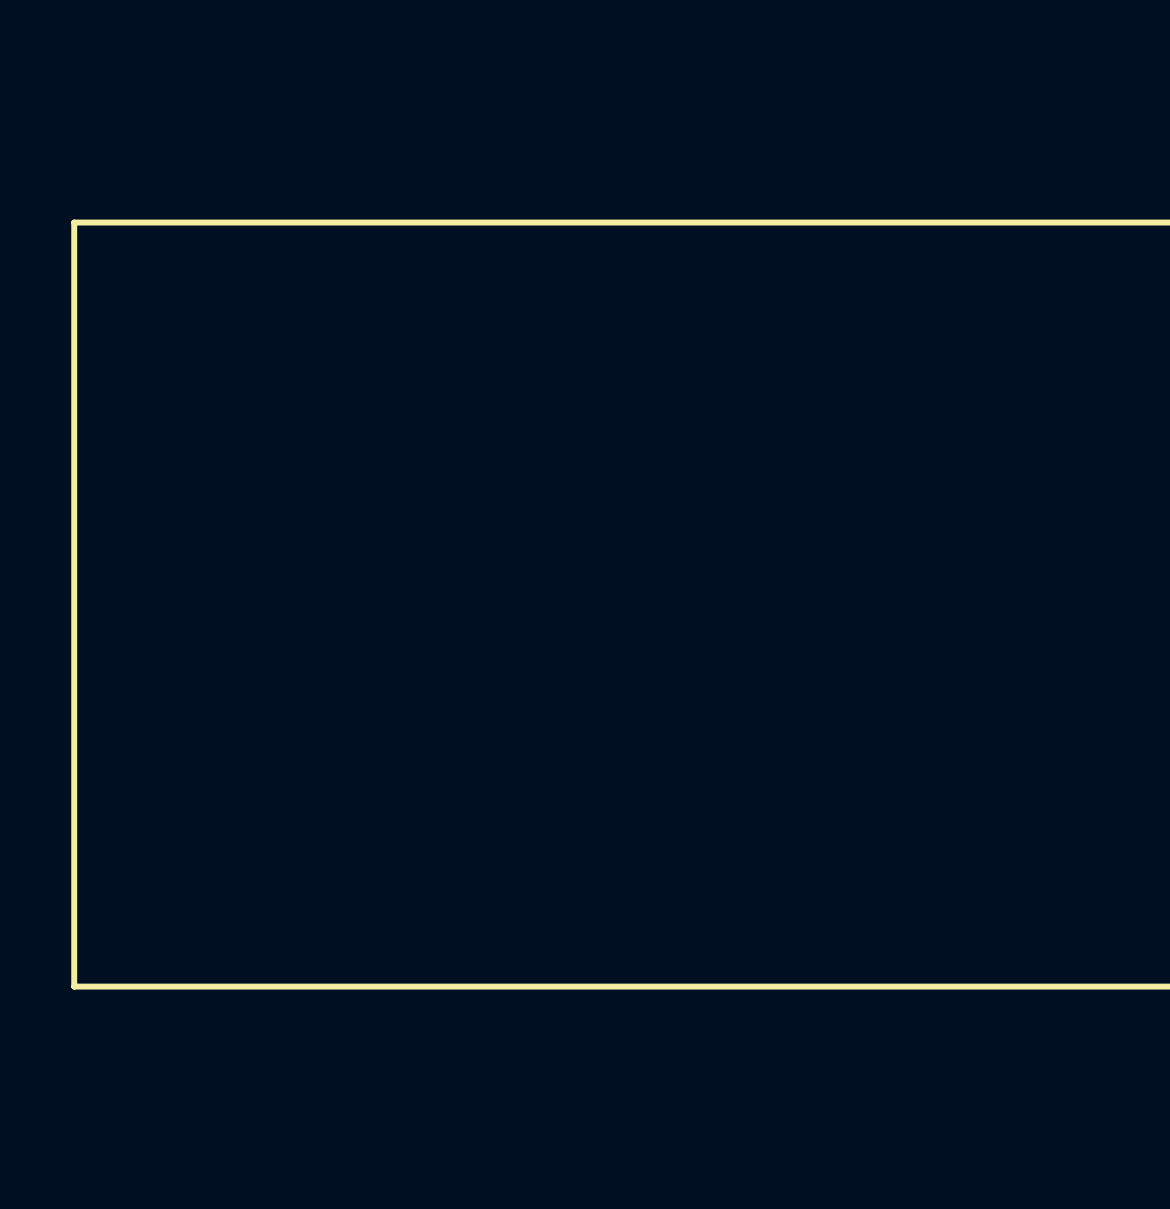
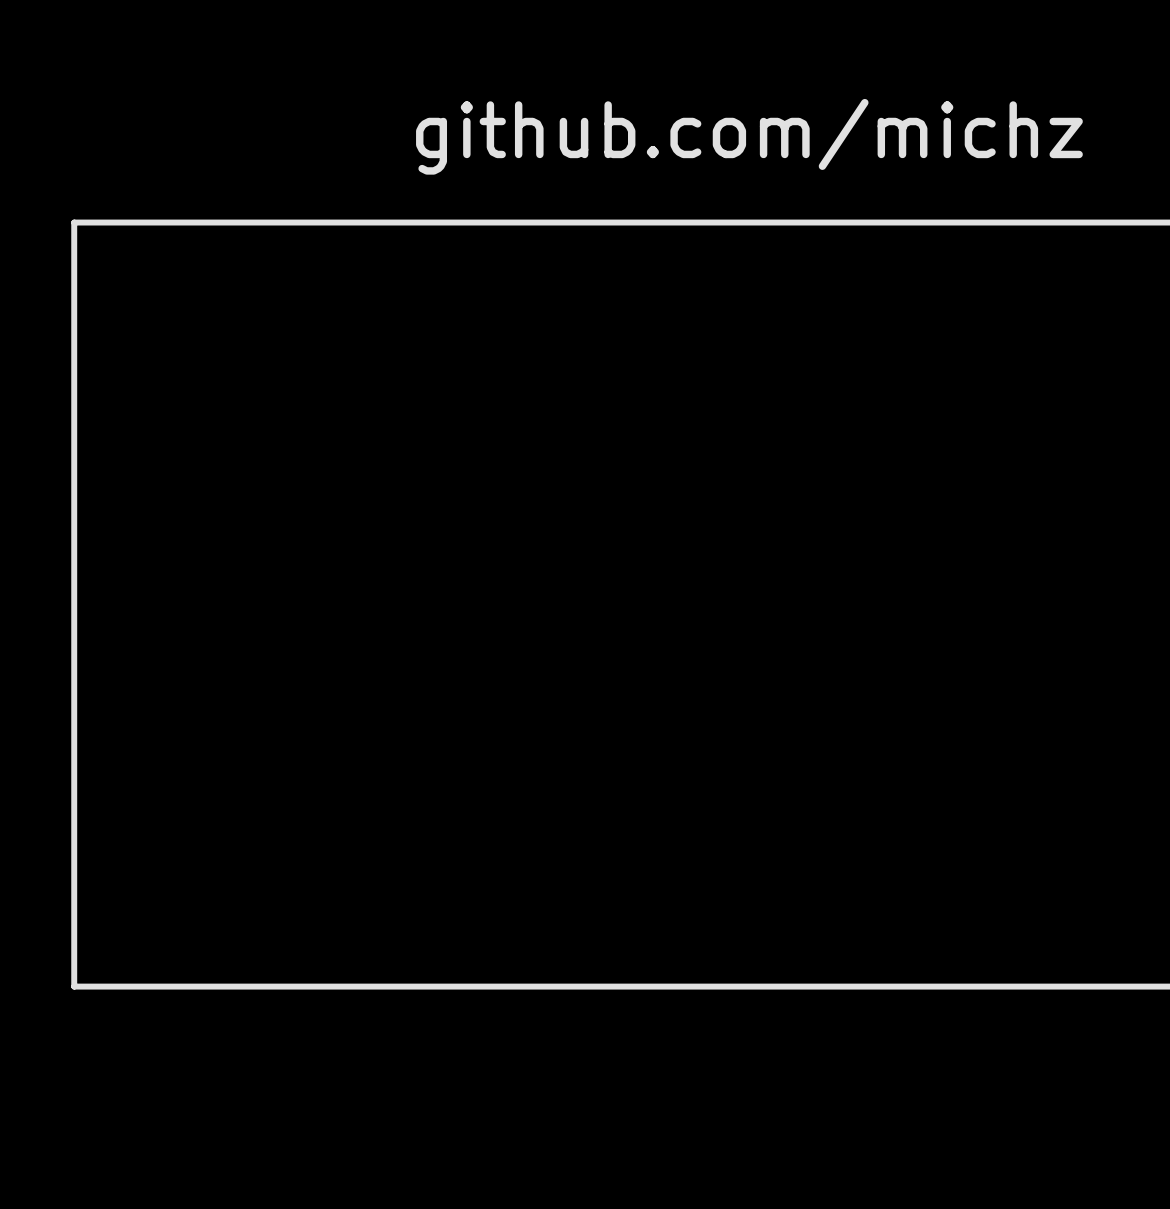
text: none -> github.com/michz (749, 136)

